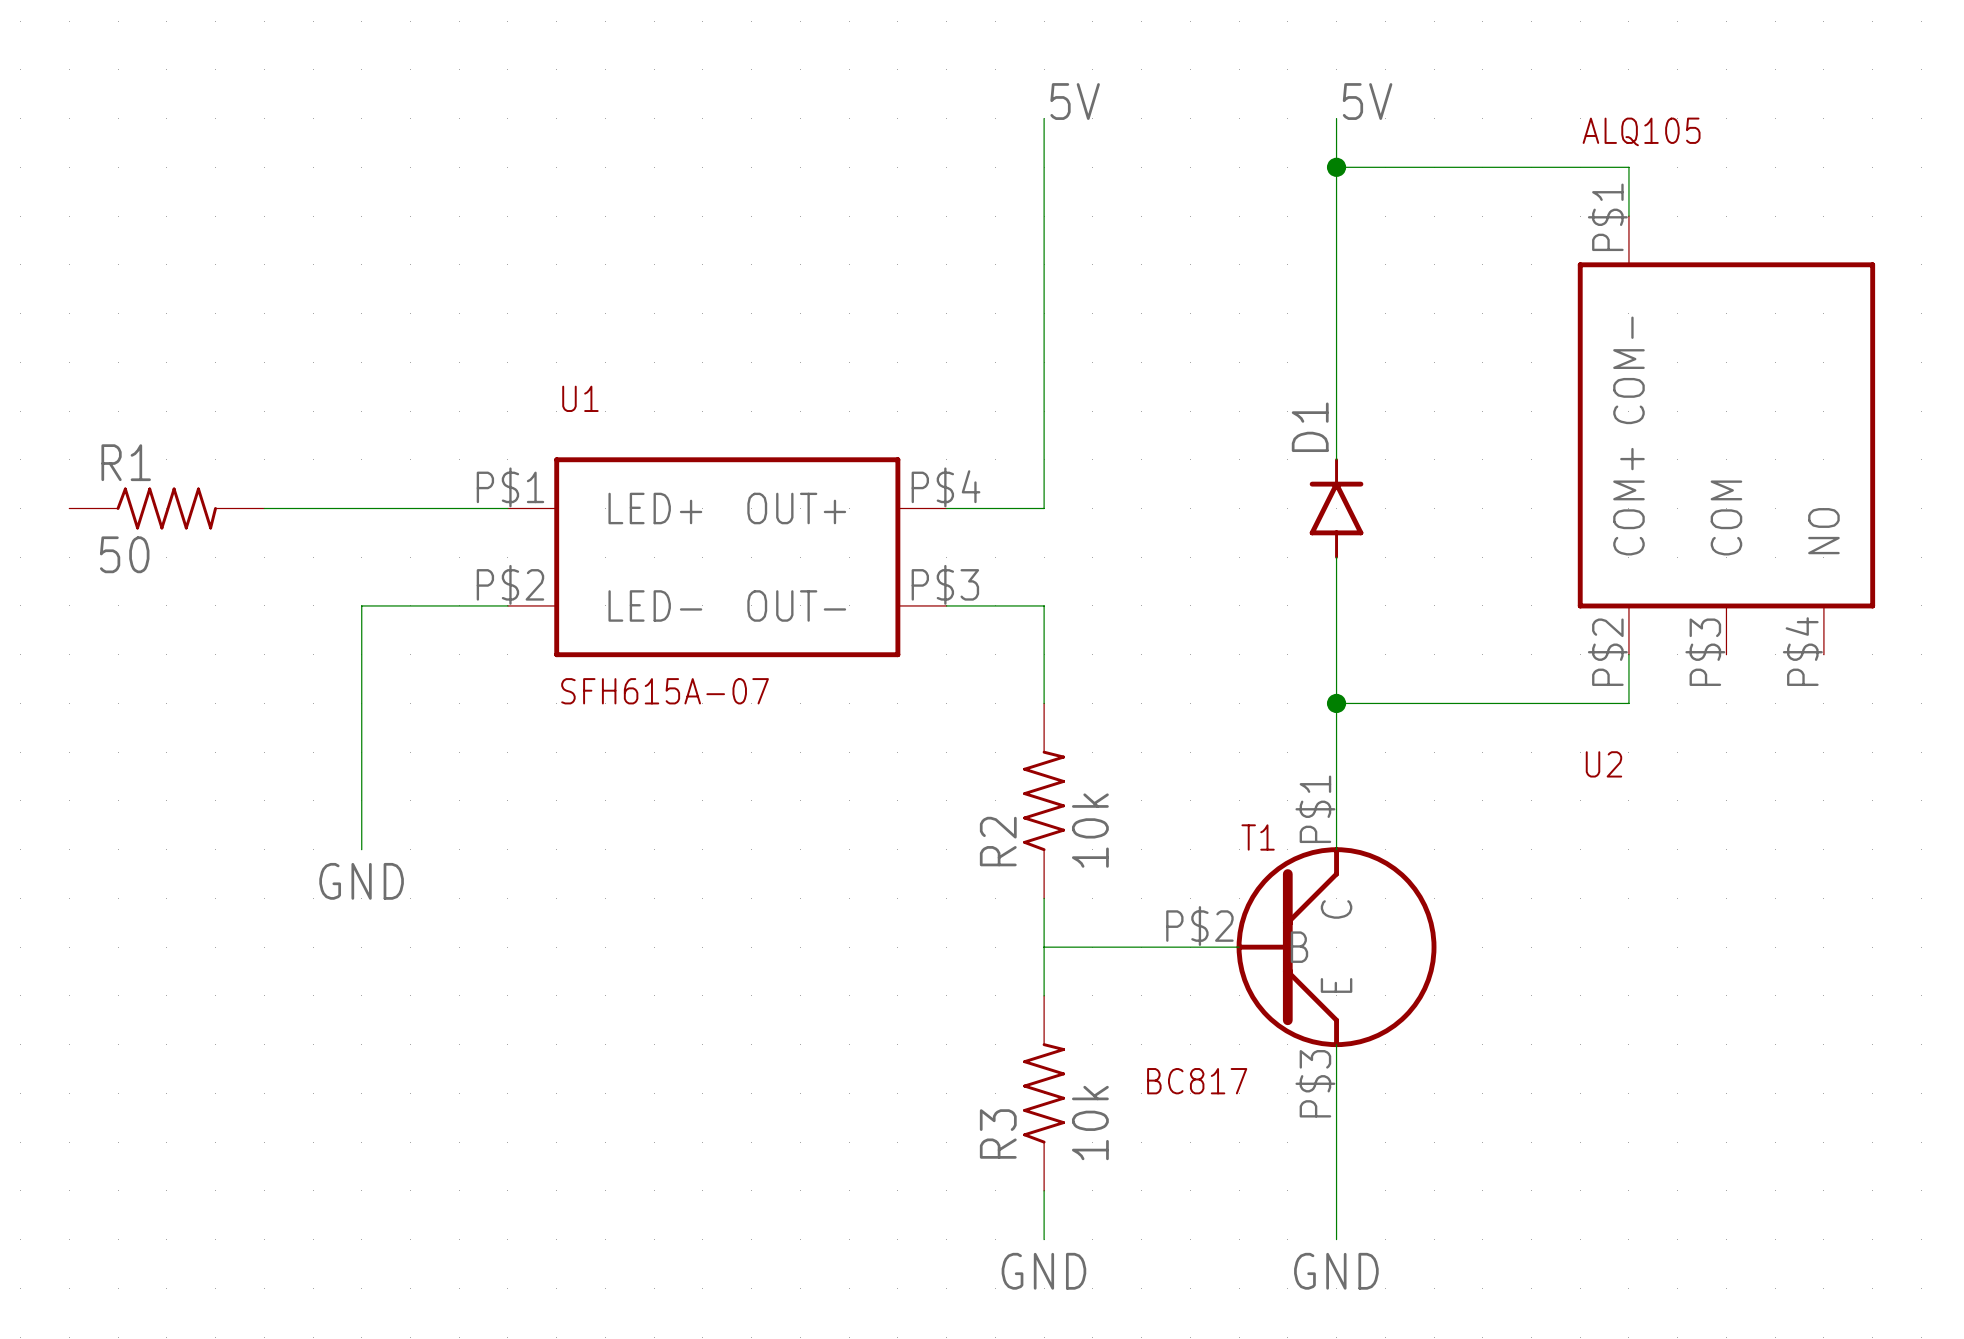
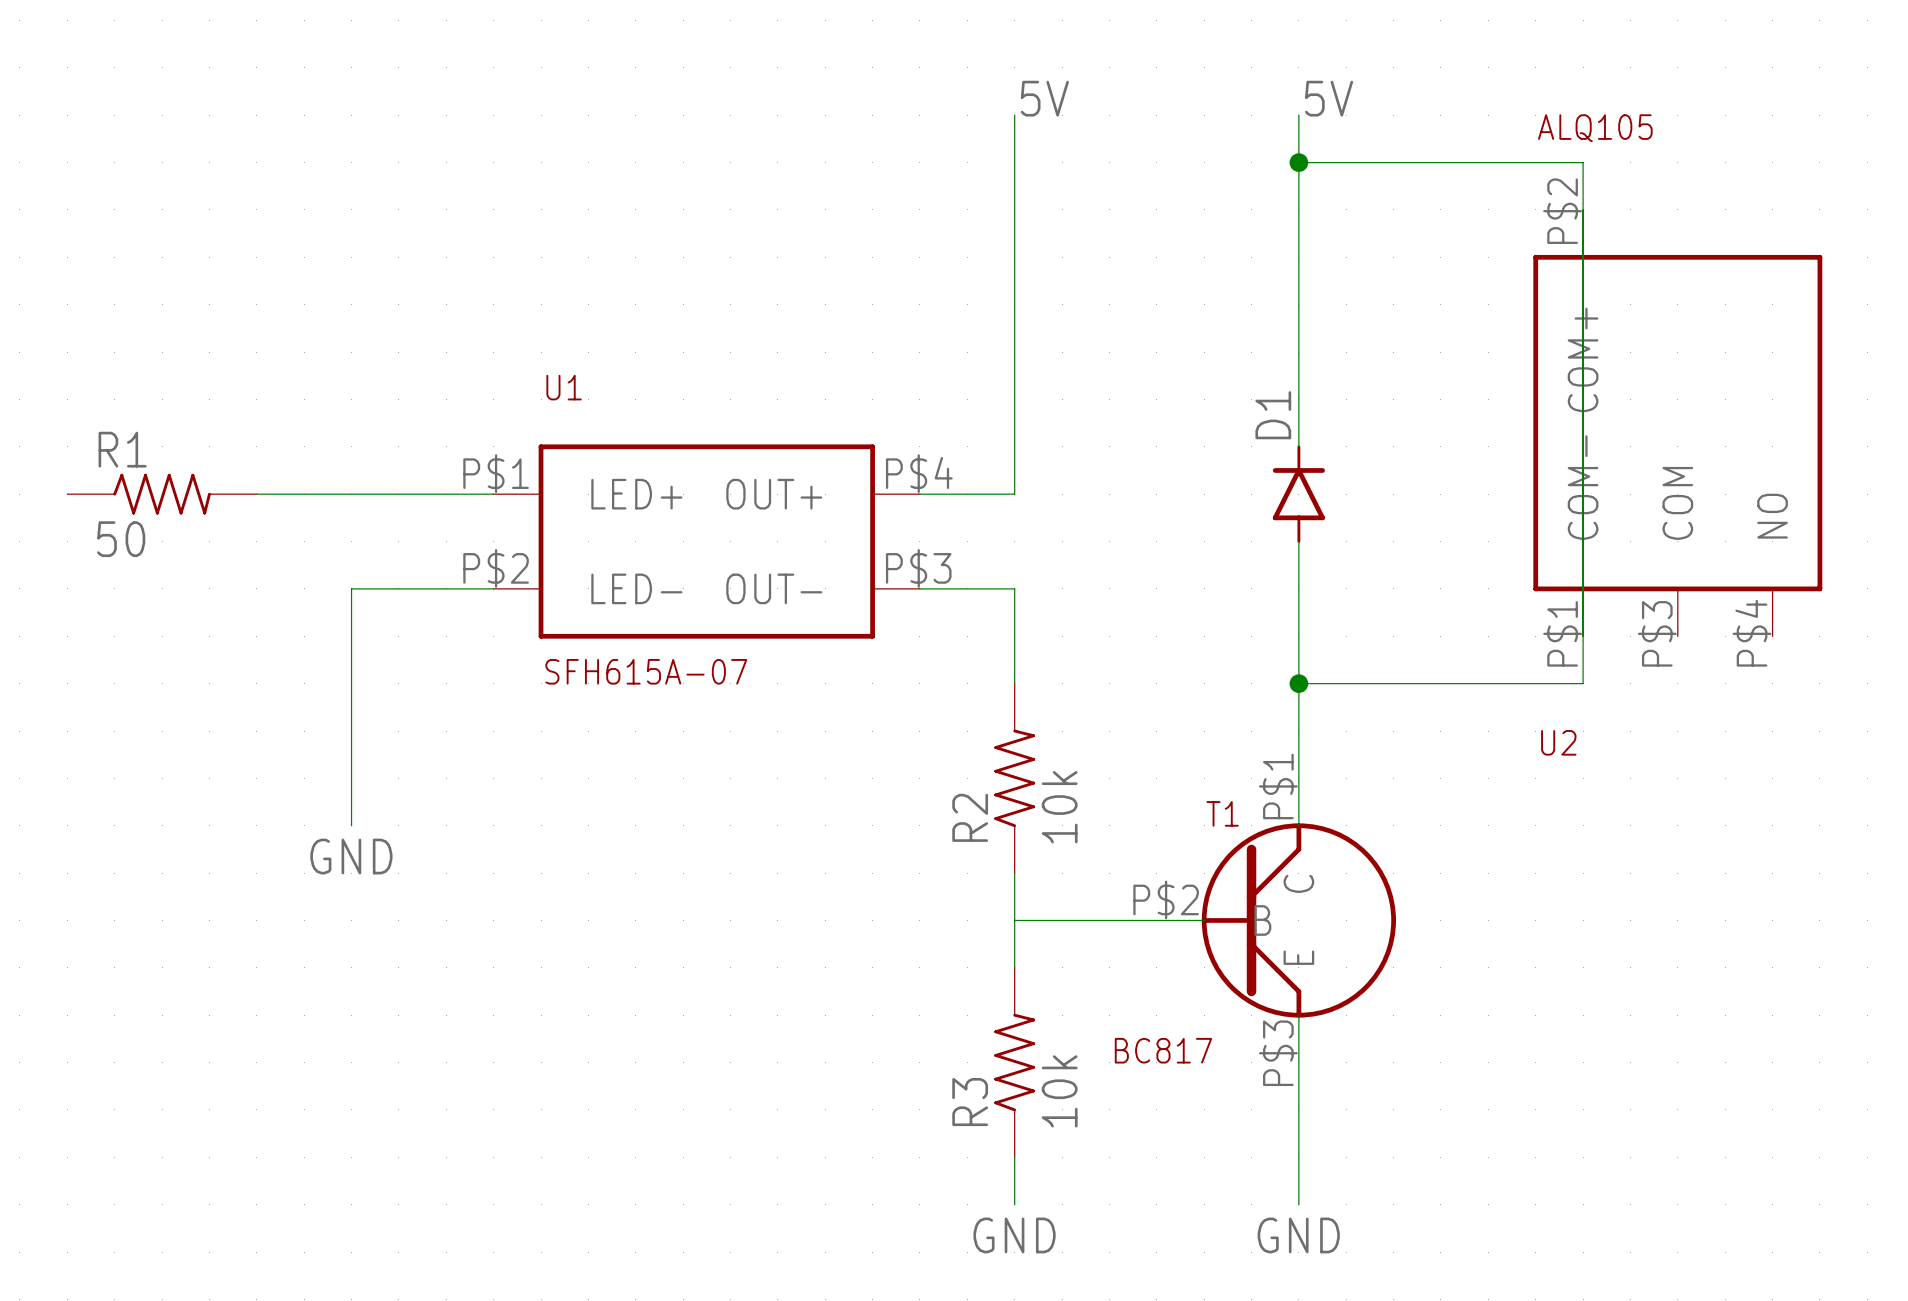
wire: none -> (1583, 209) (1583, 636)
U2 pin number: P$1 (1607, 217) -> P$2 (1562, 211)
U2 pin name: COM- (1628, 370) -> COM+ (1583, 359)
U2 pin name: COM+ (1628, 501) -> COM- (1583, 487)
U2 pin number: P$2 (1607, 652) -> P$1 (1562, 633)

